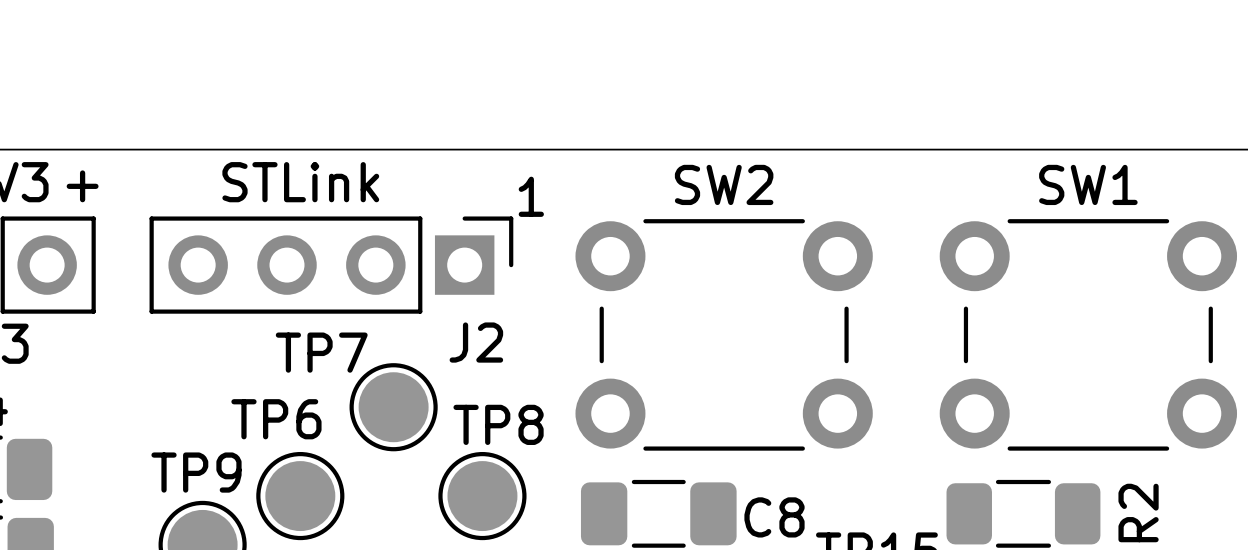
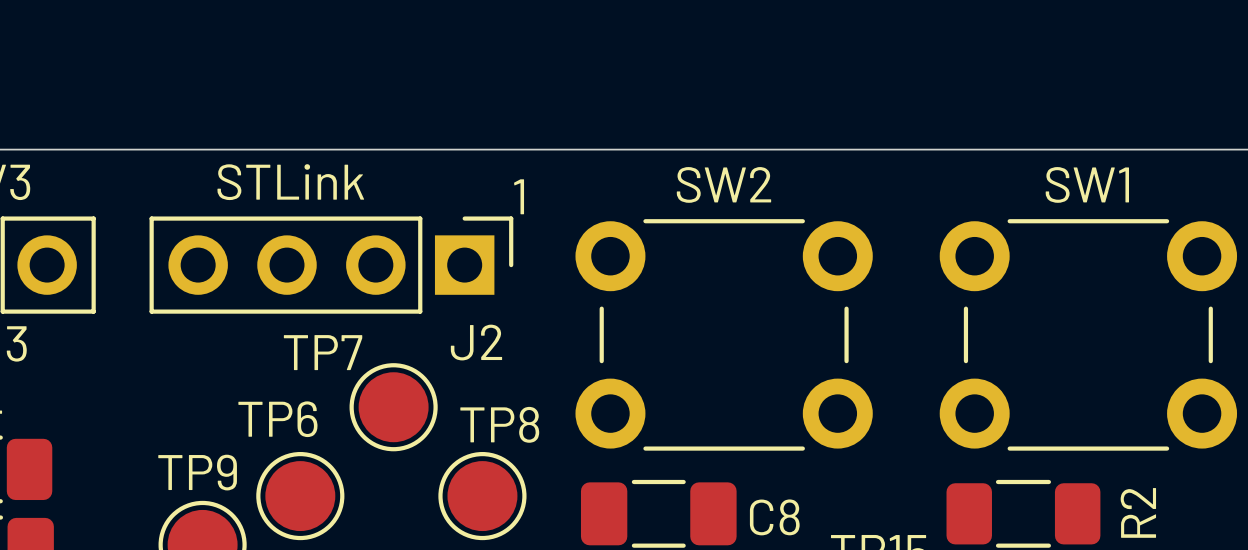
text: + (82, 186) -> none

